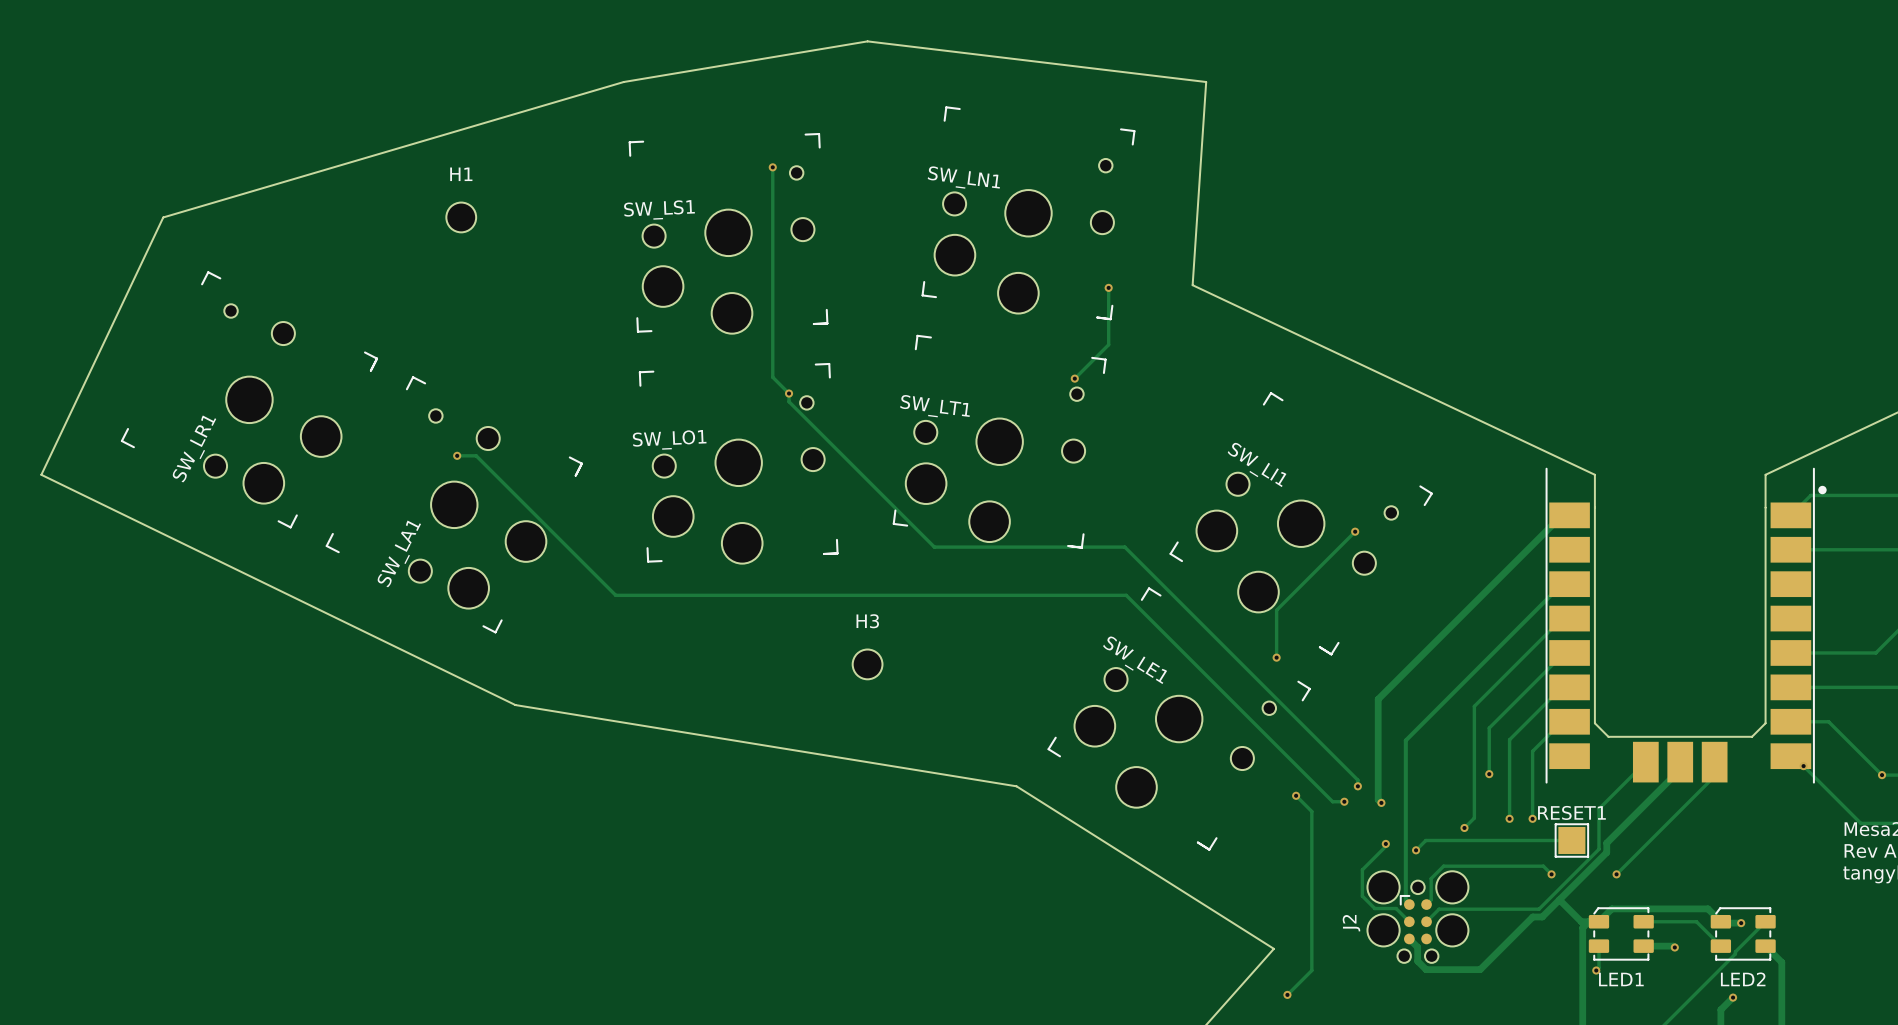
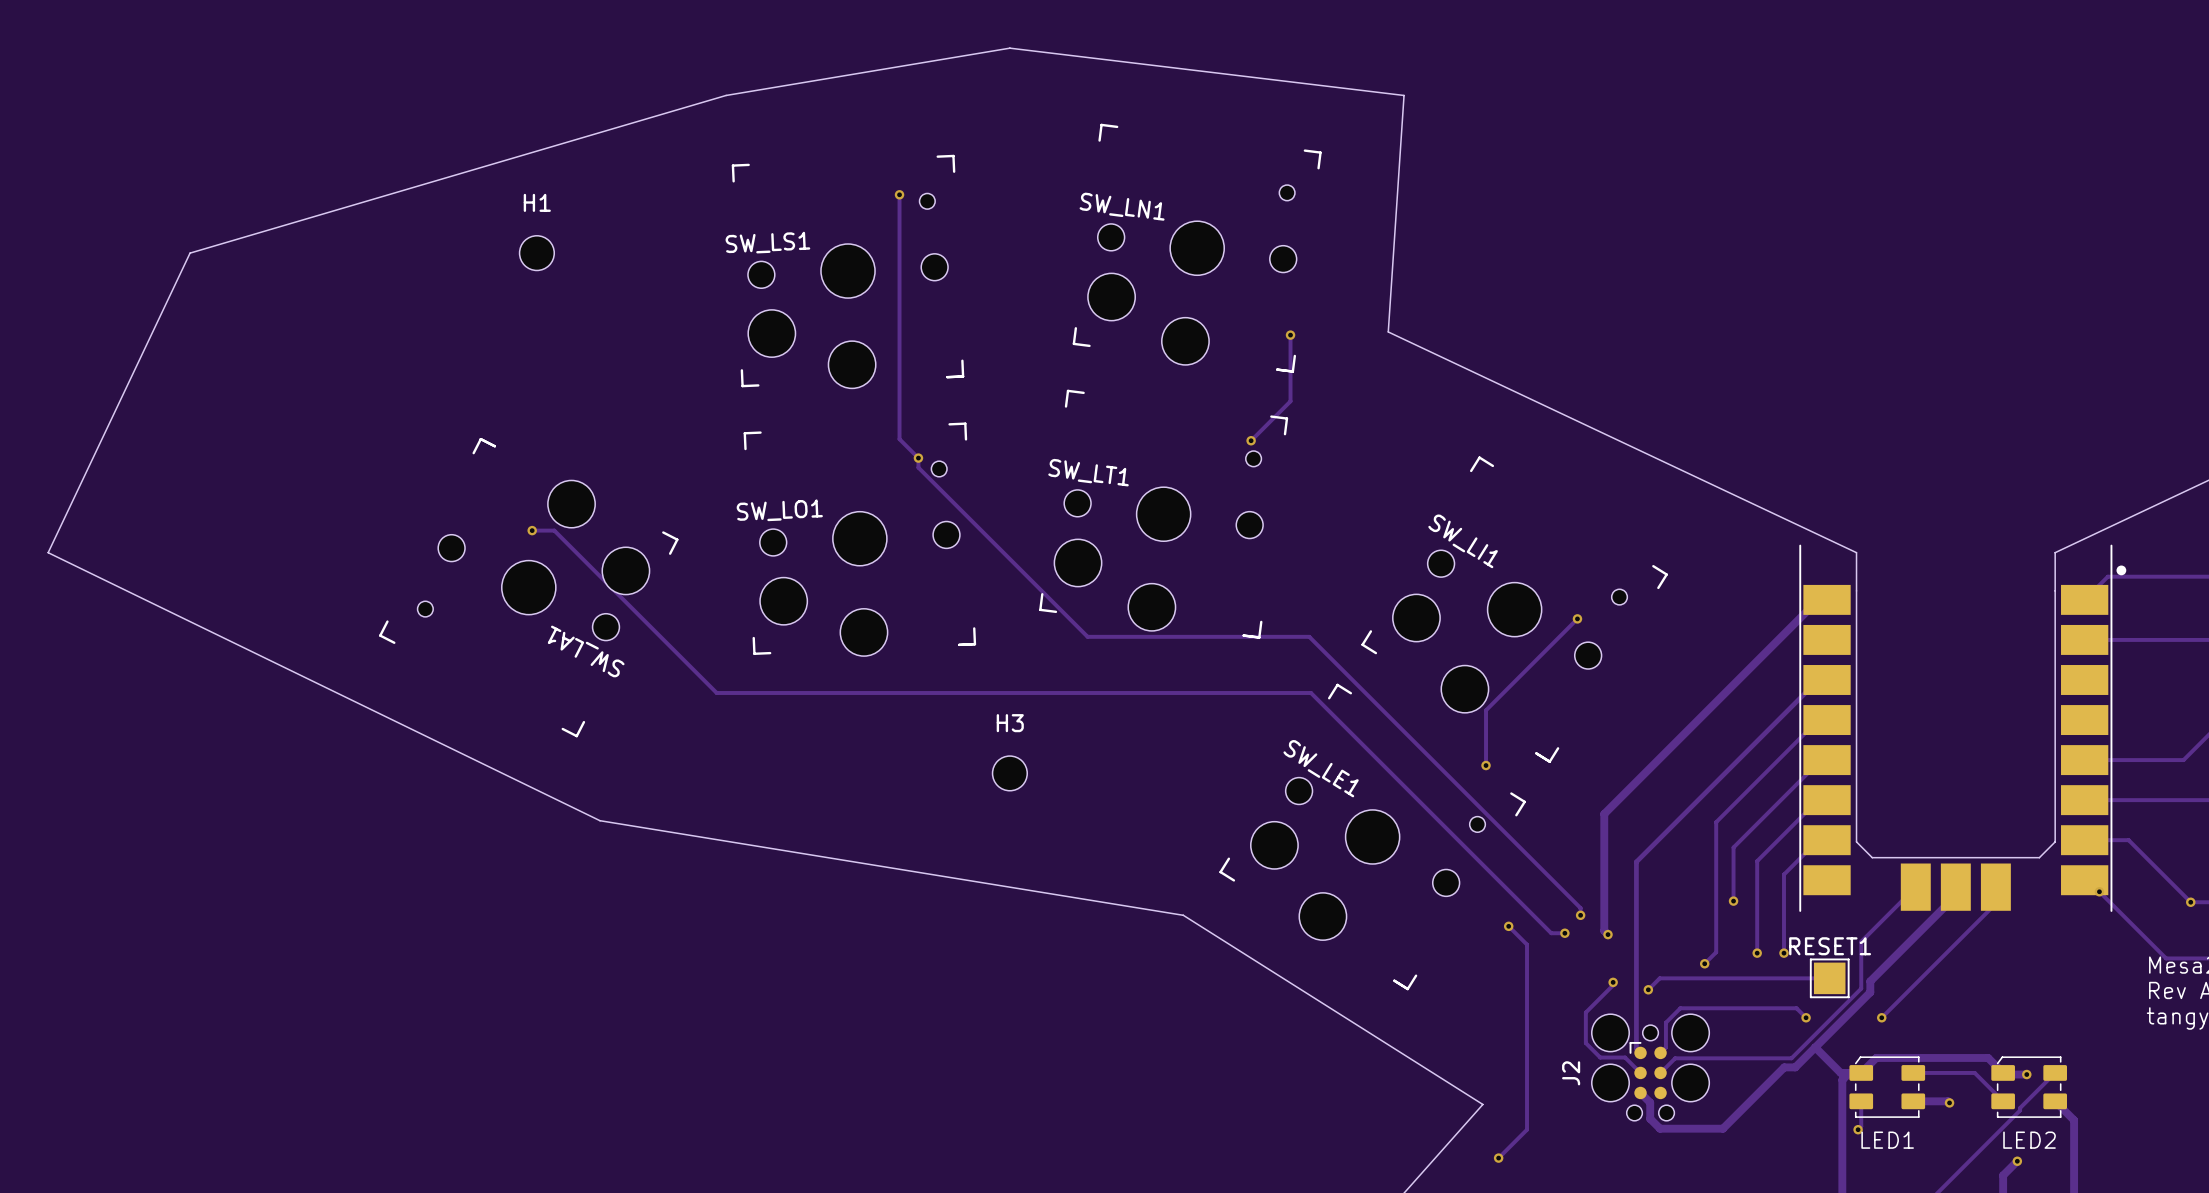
SW_LR1: (249, 399) -> none
SW_LA1 rotation: 0° (454, 504) -> 90° counterclockwise (528, 587)

